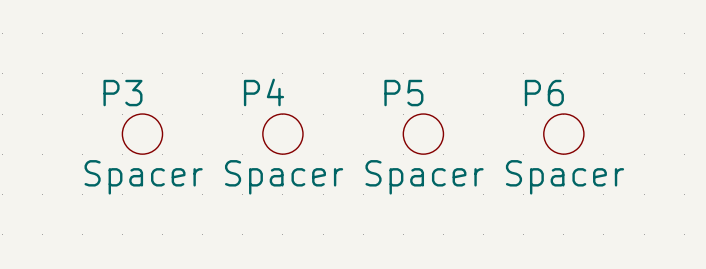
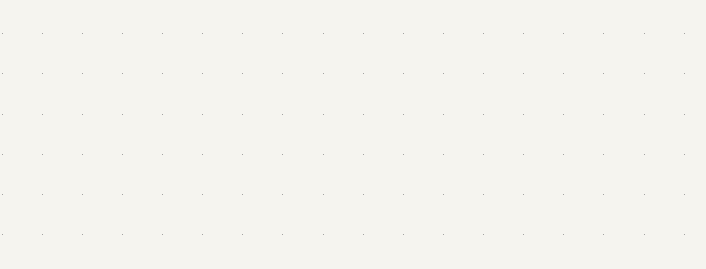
P3: Spacer (142, 134) -> none
P4: Spacer (282, 134) -> none
P5: Spacer (423, 134) -> none
P6: Spacer (563, 134) -> none

